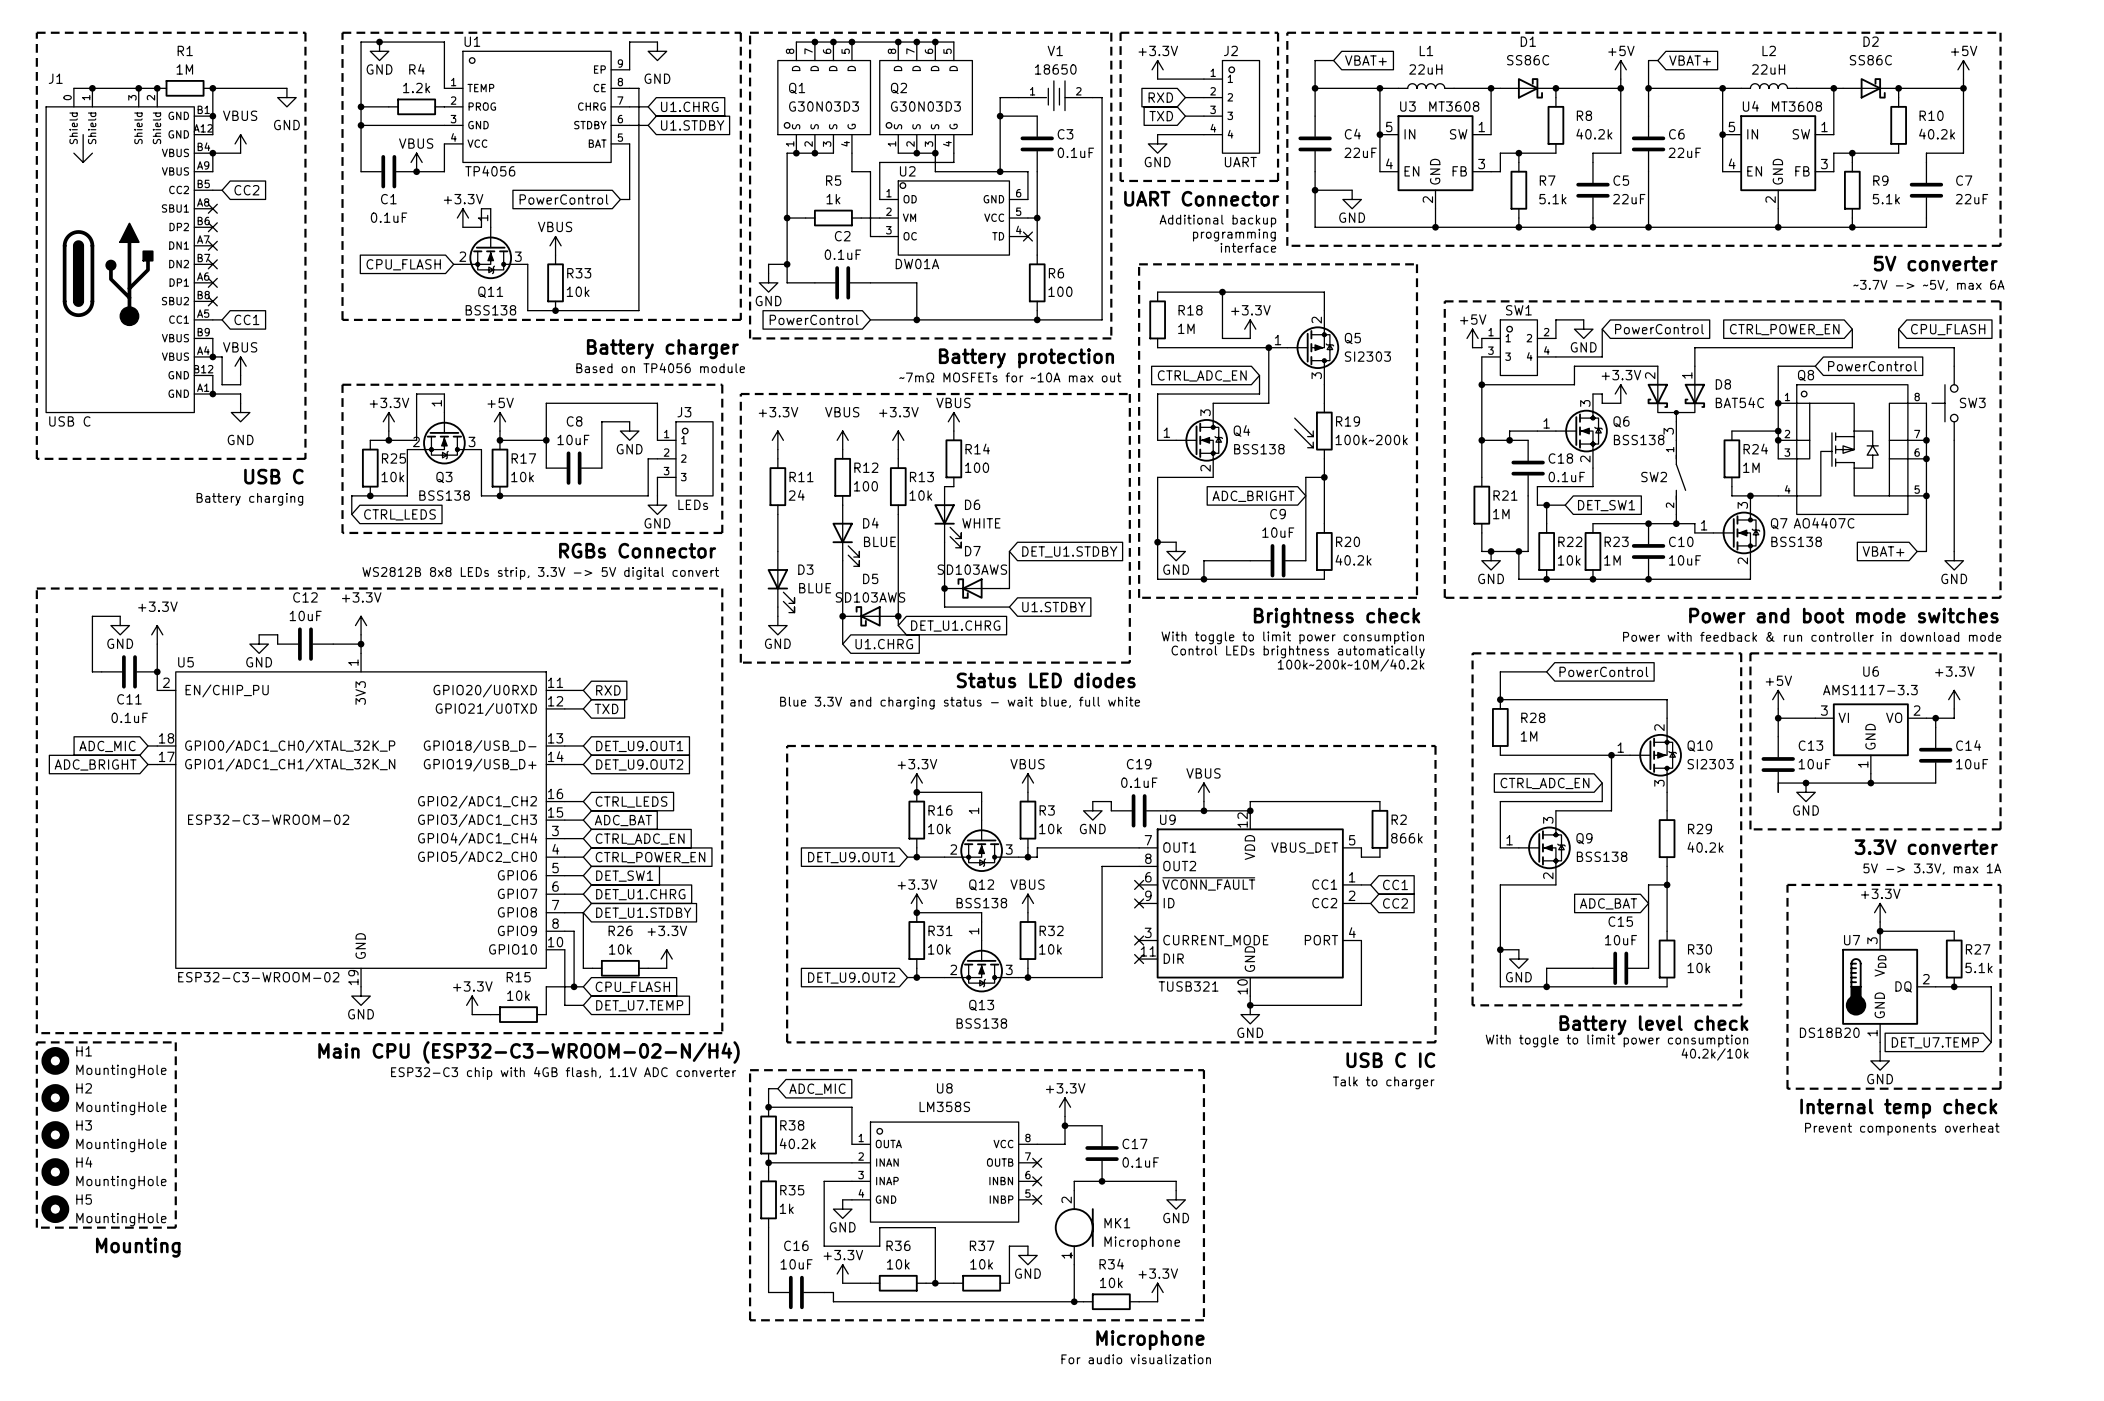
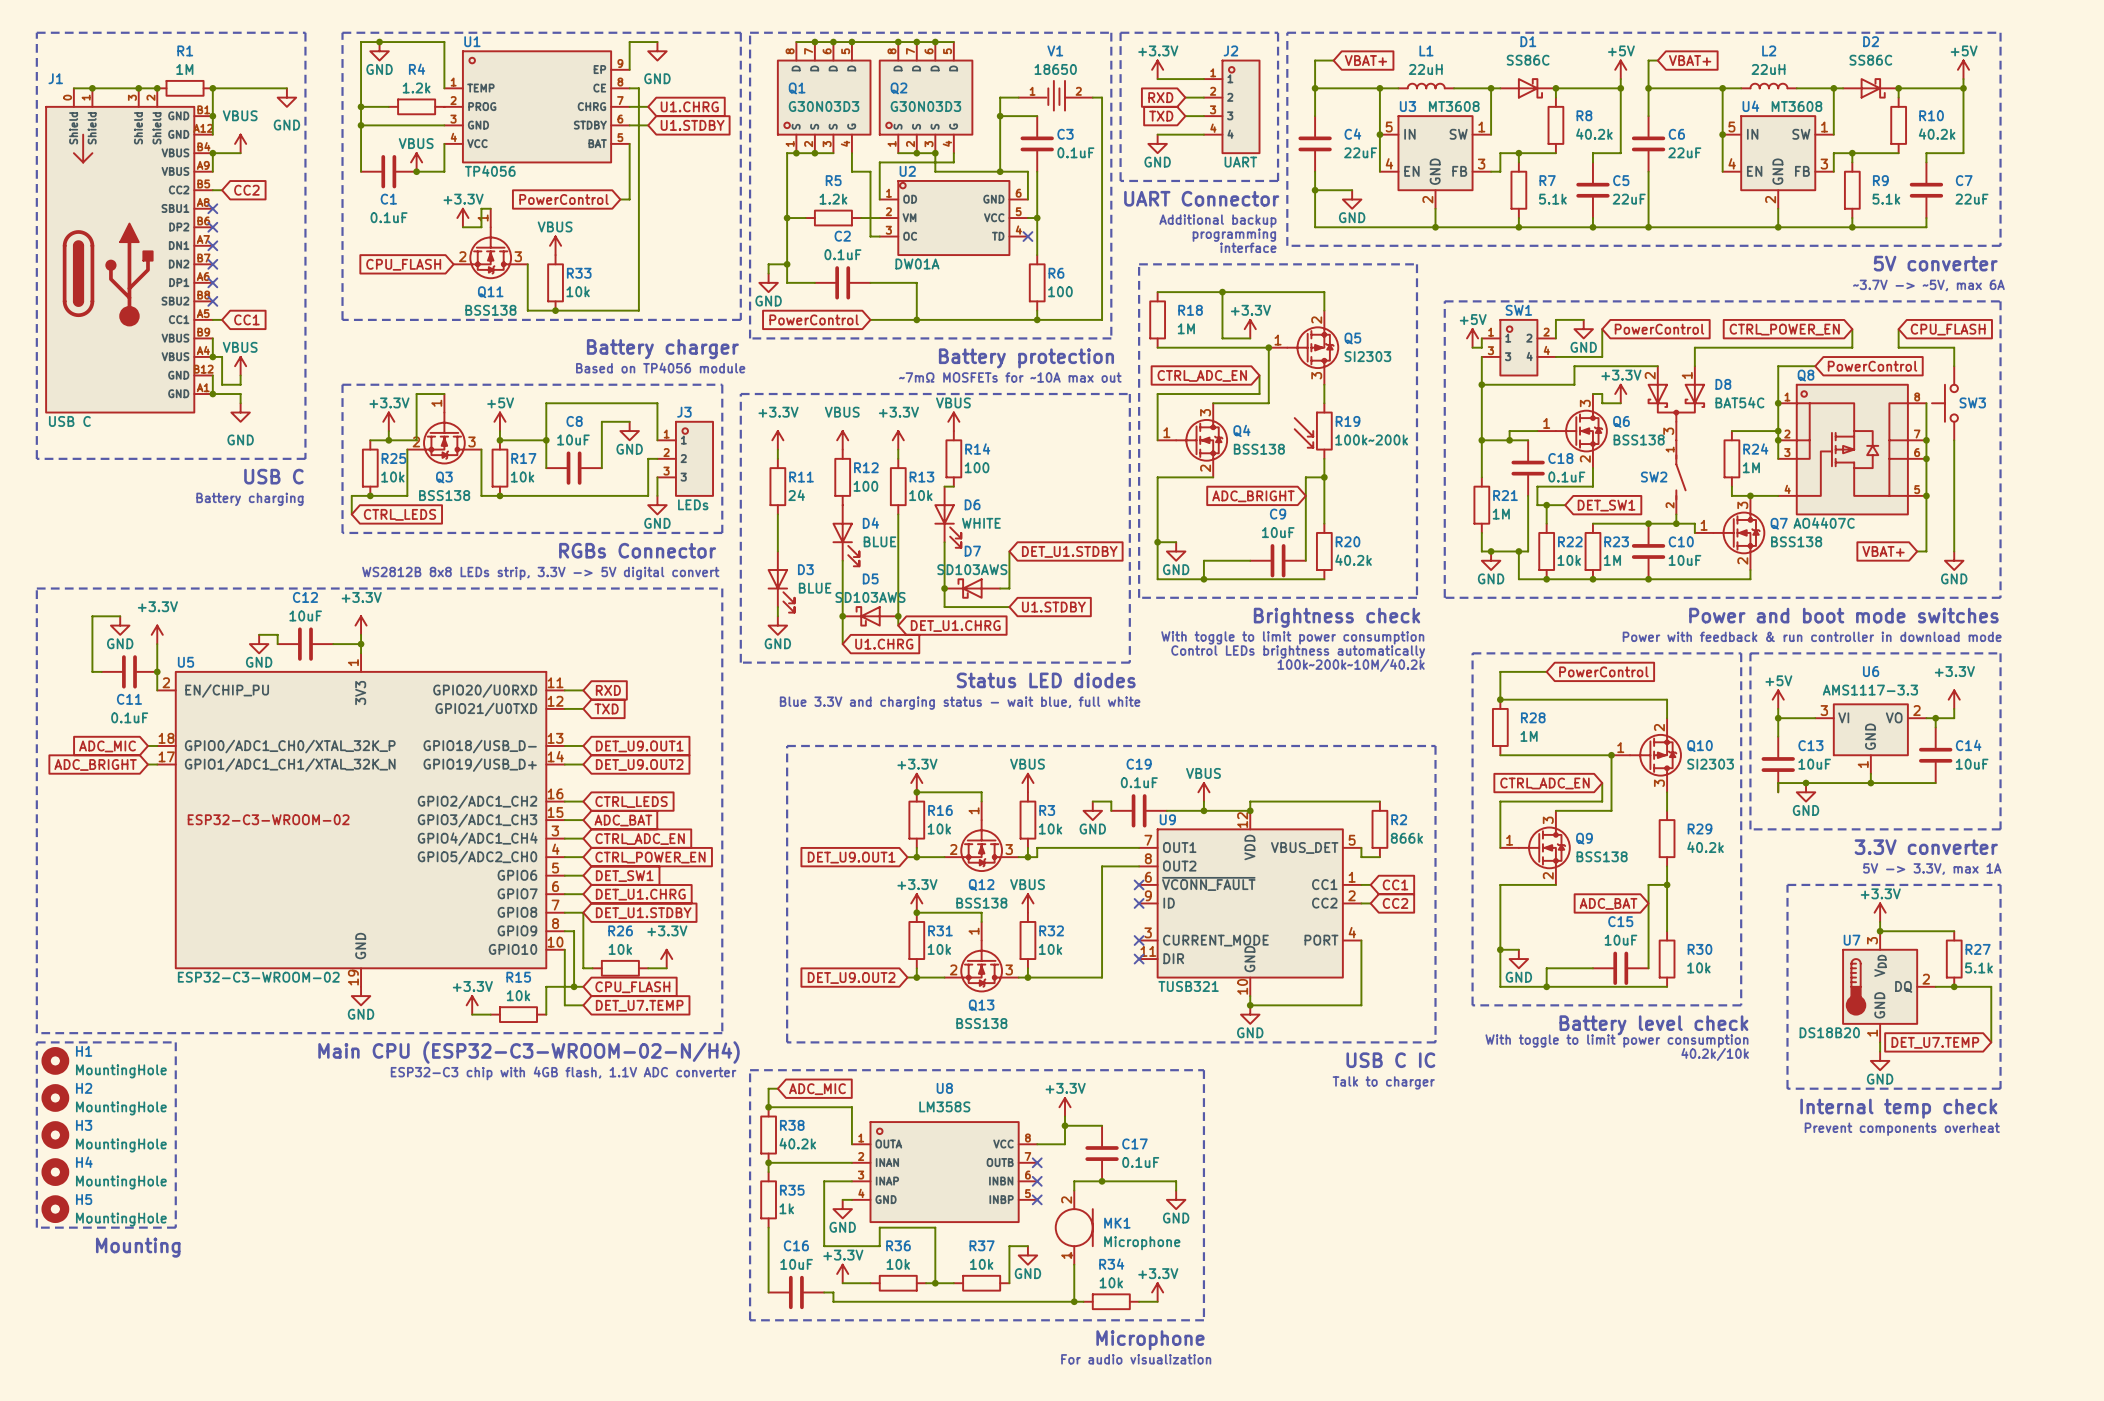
R5 value: 1k (833, 199) -> 1.2k (833, 199)

